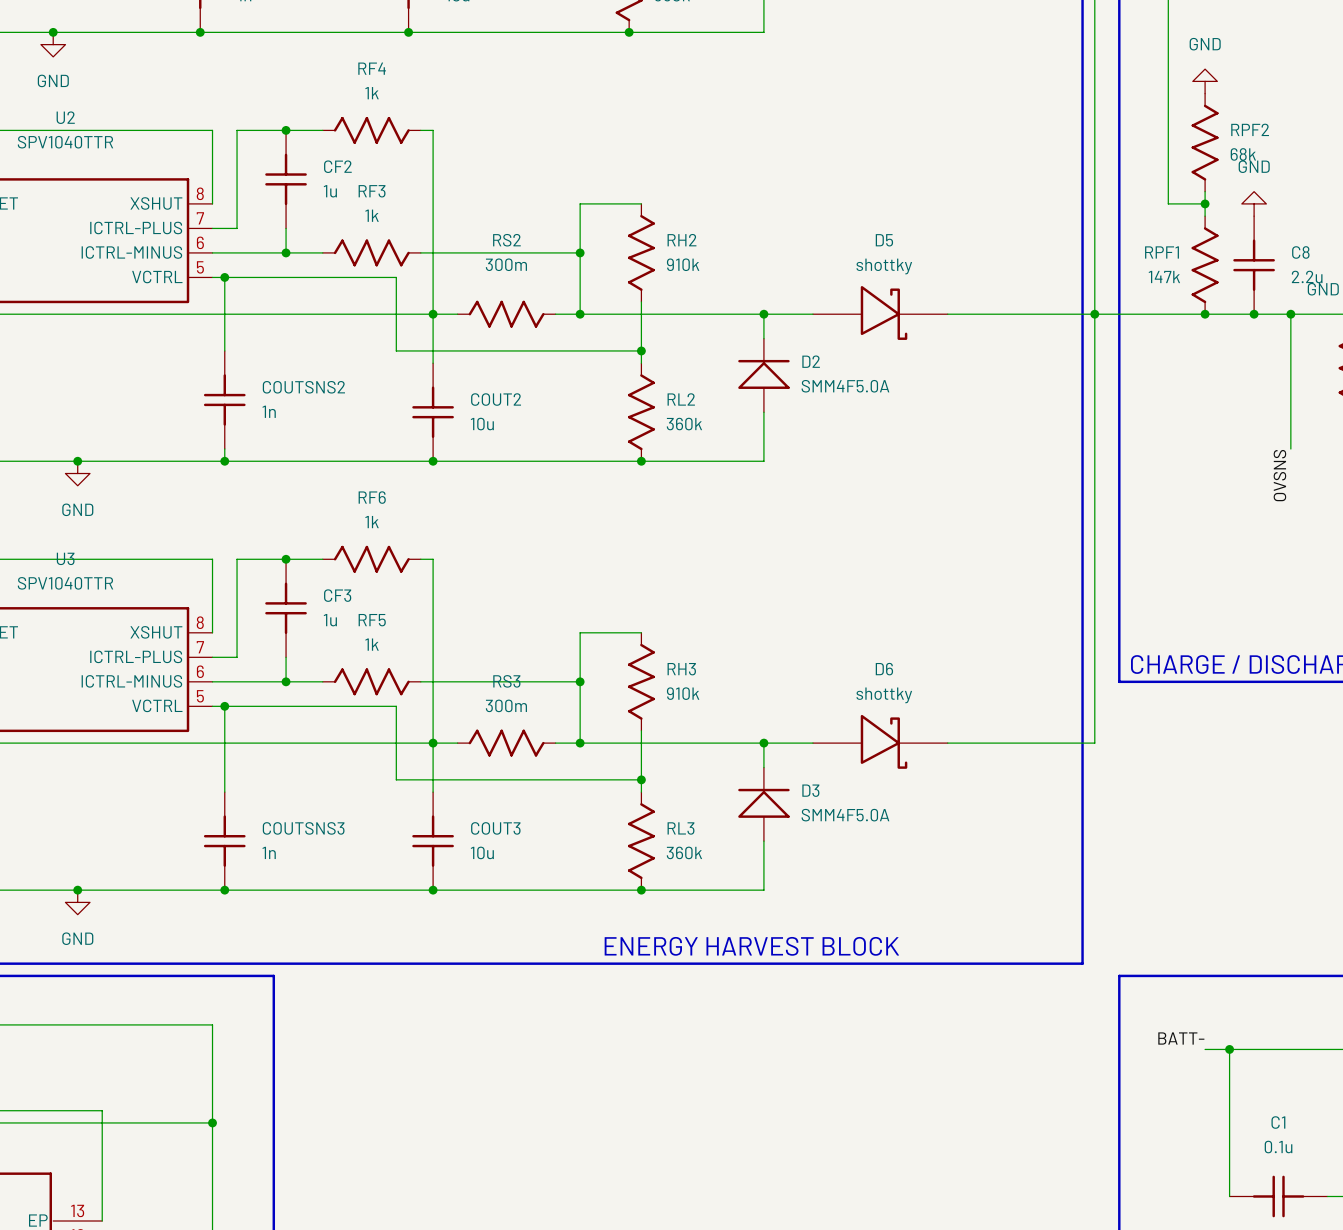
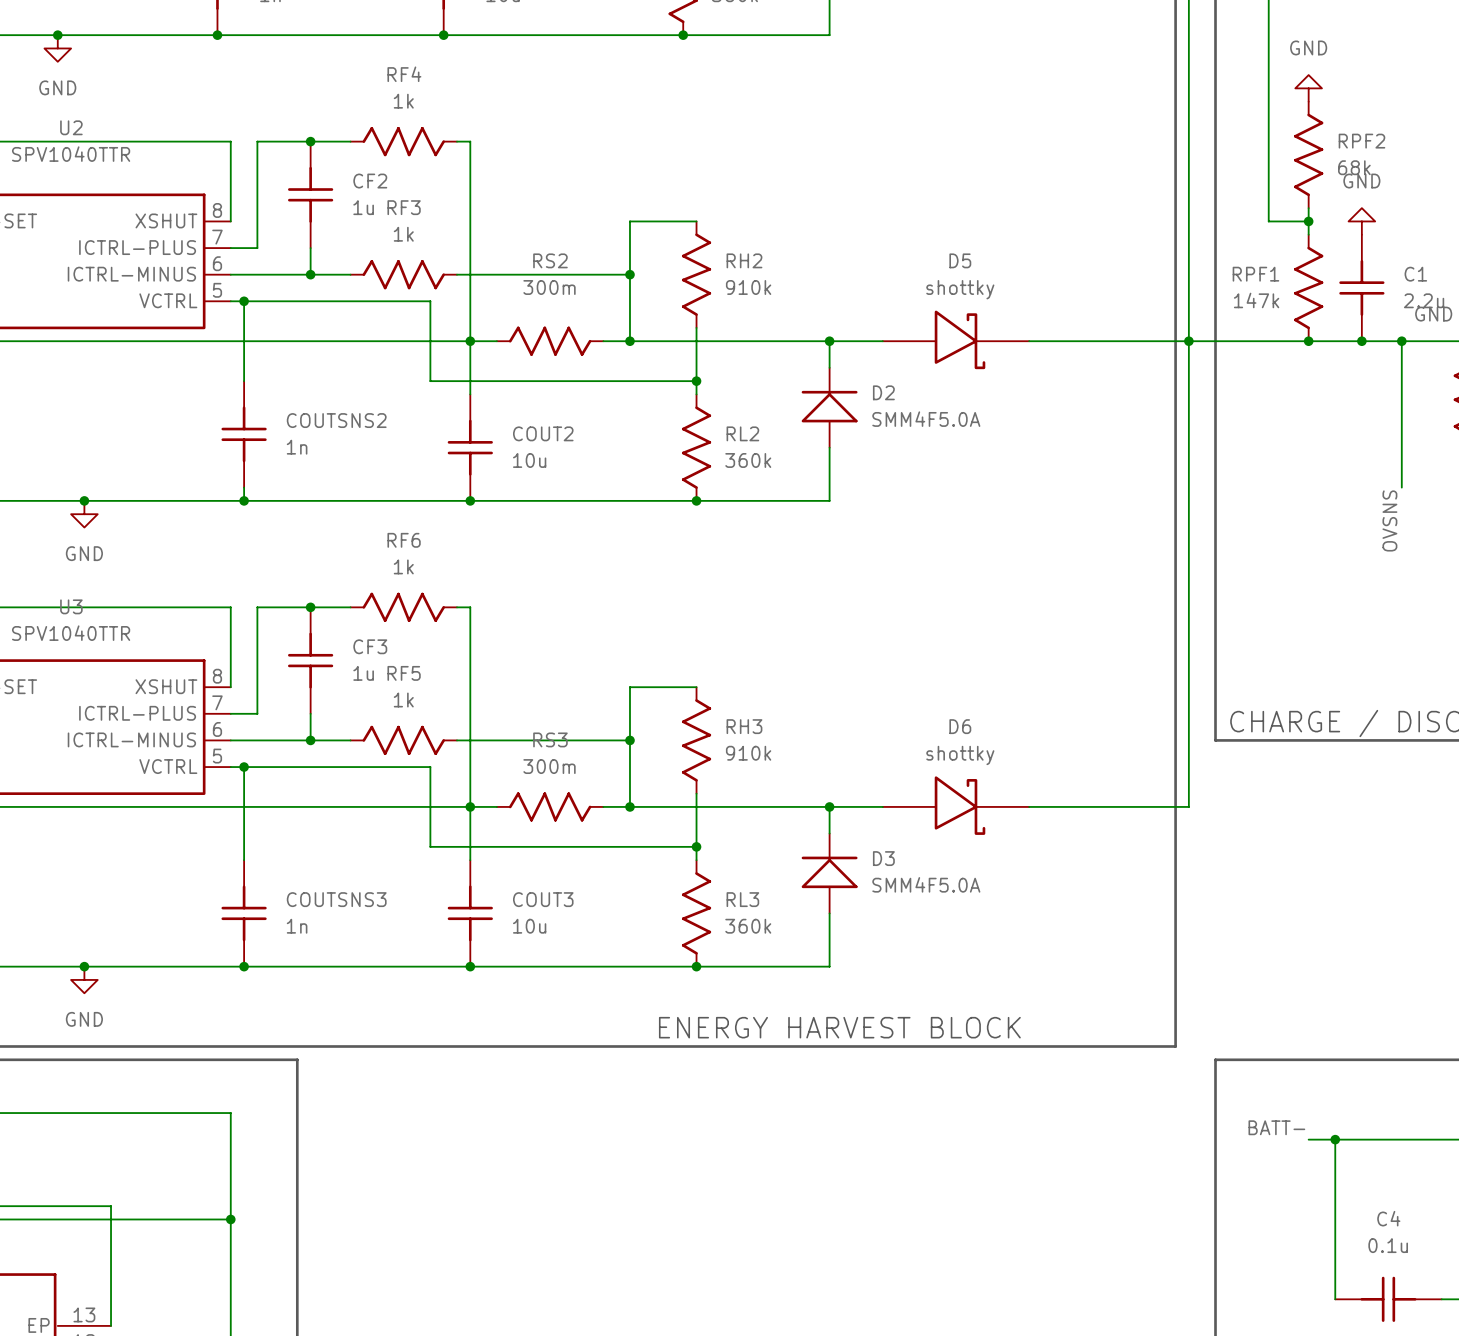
C8 name: C8 (1300, 252) -> C1 (1415, 274)
C1 name: C1 (1278, 1122) -> C4 (1388, 1218)

